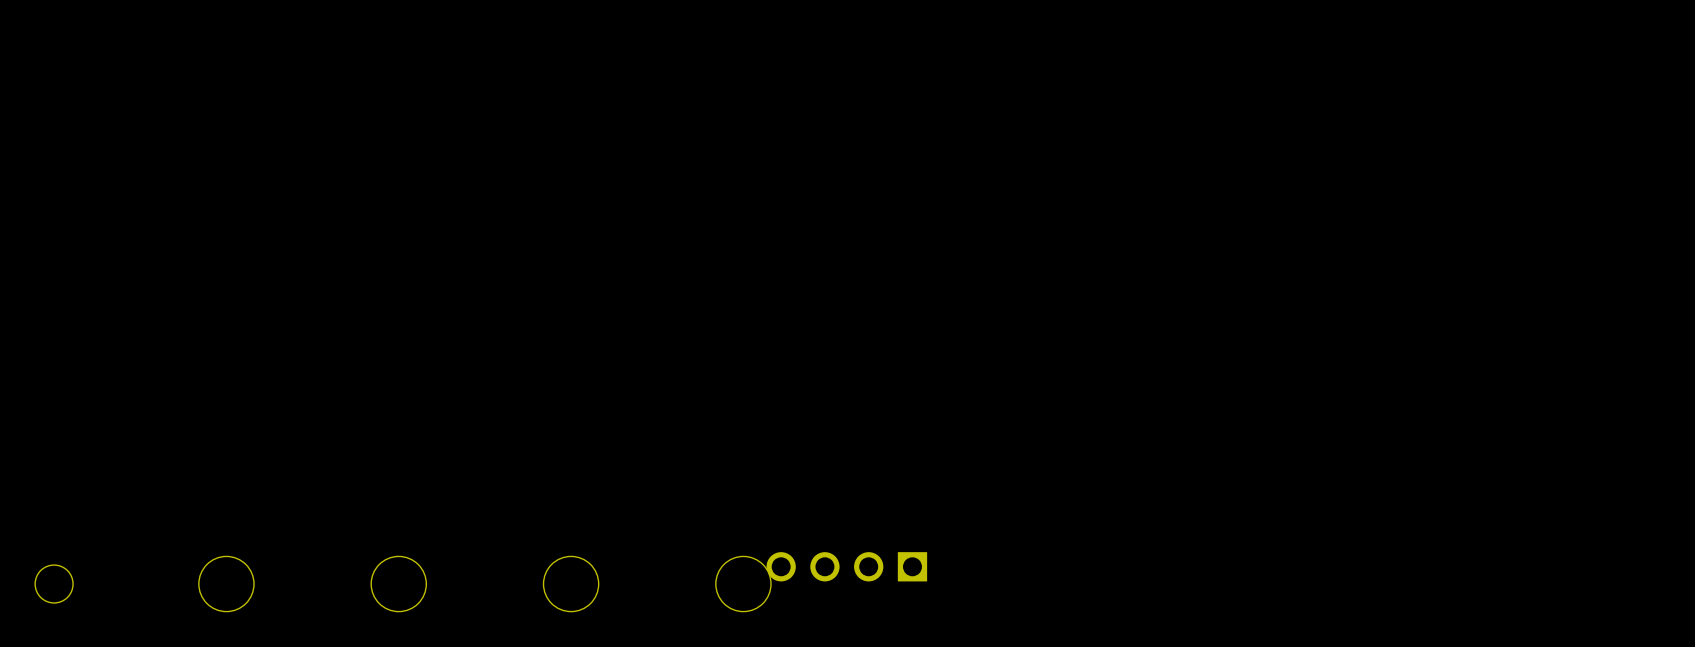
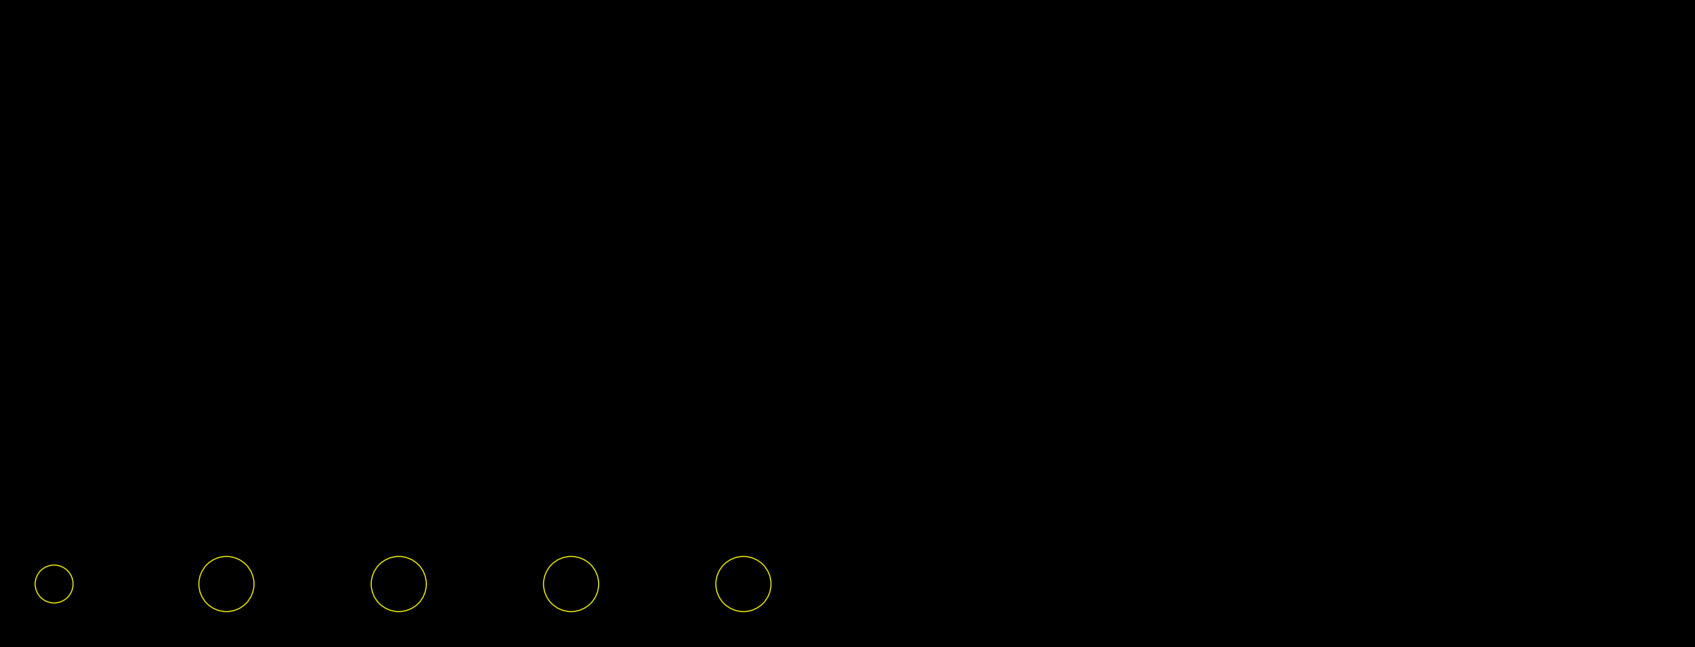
part: (846, 566) -> none

